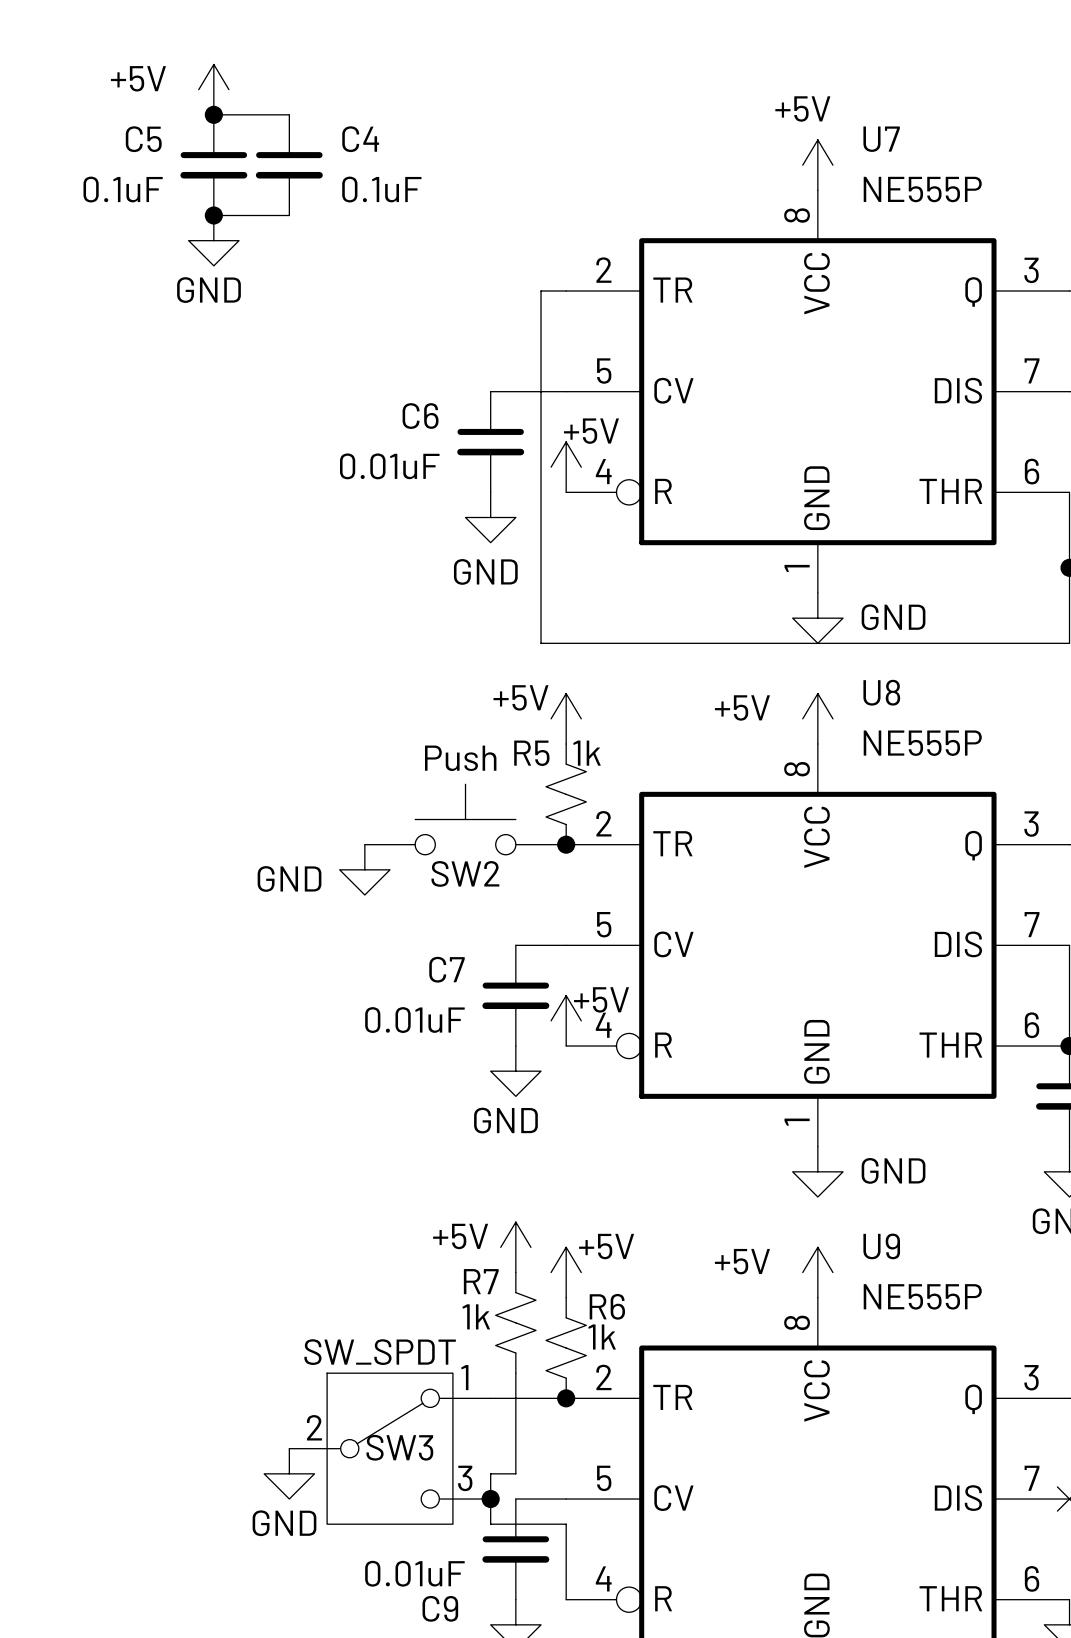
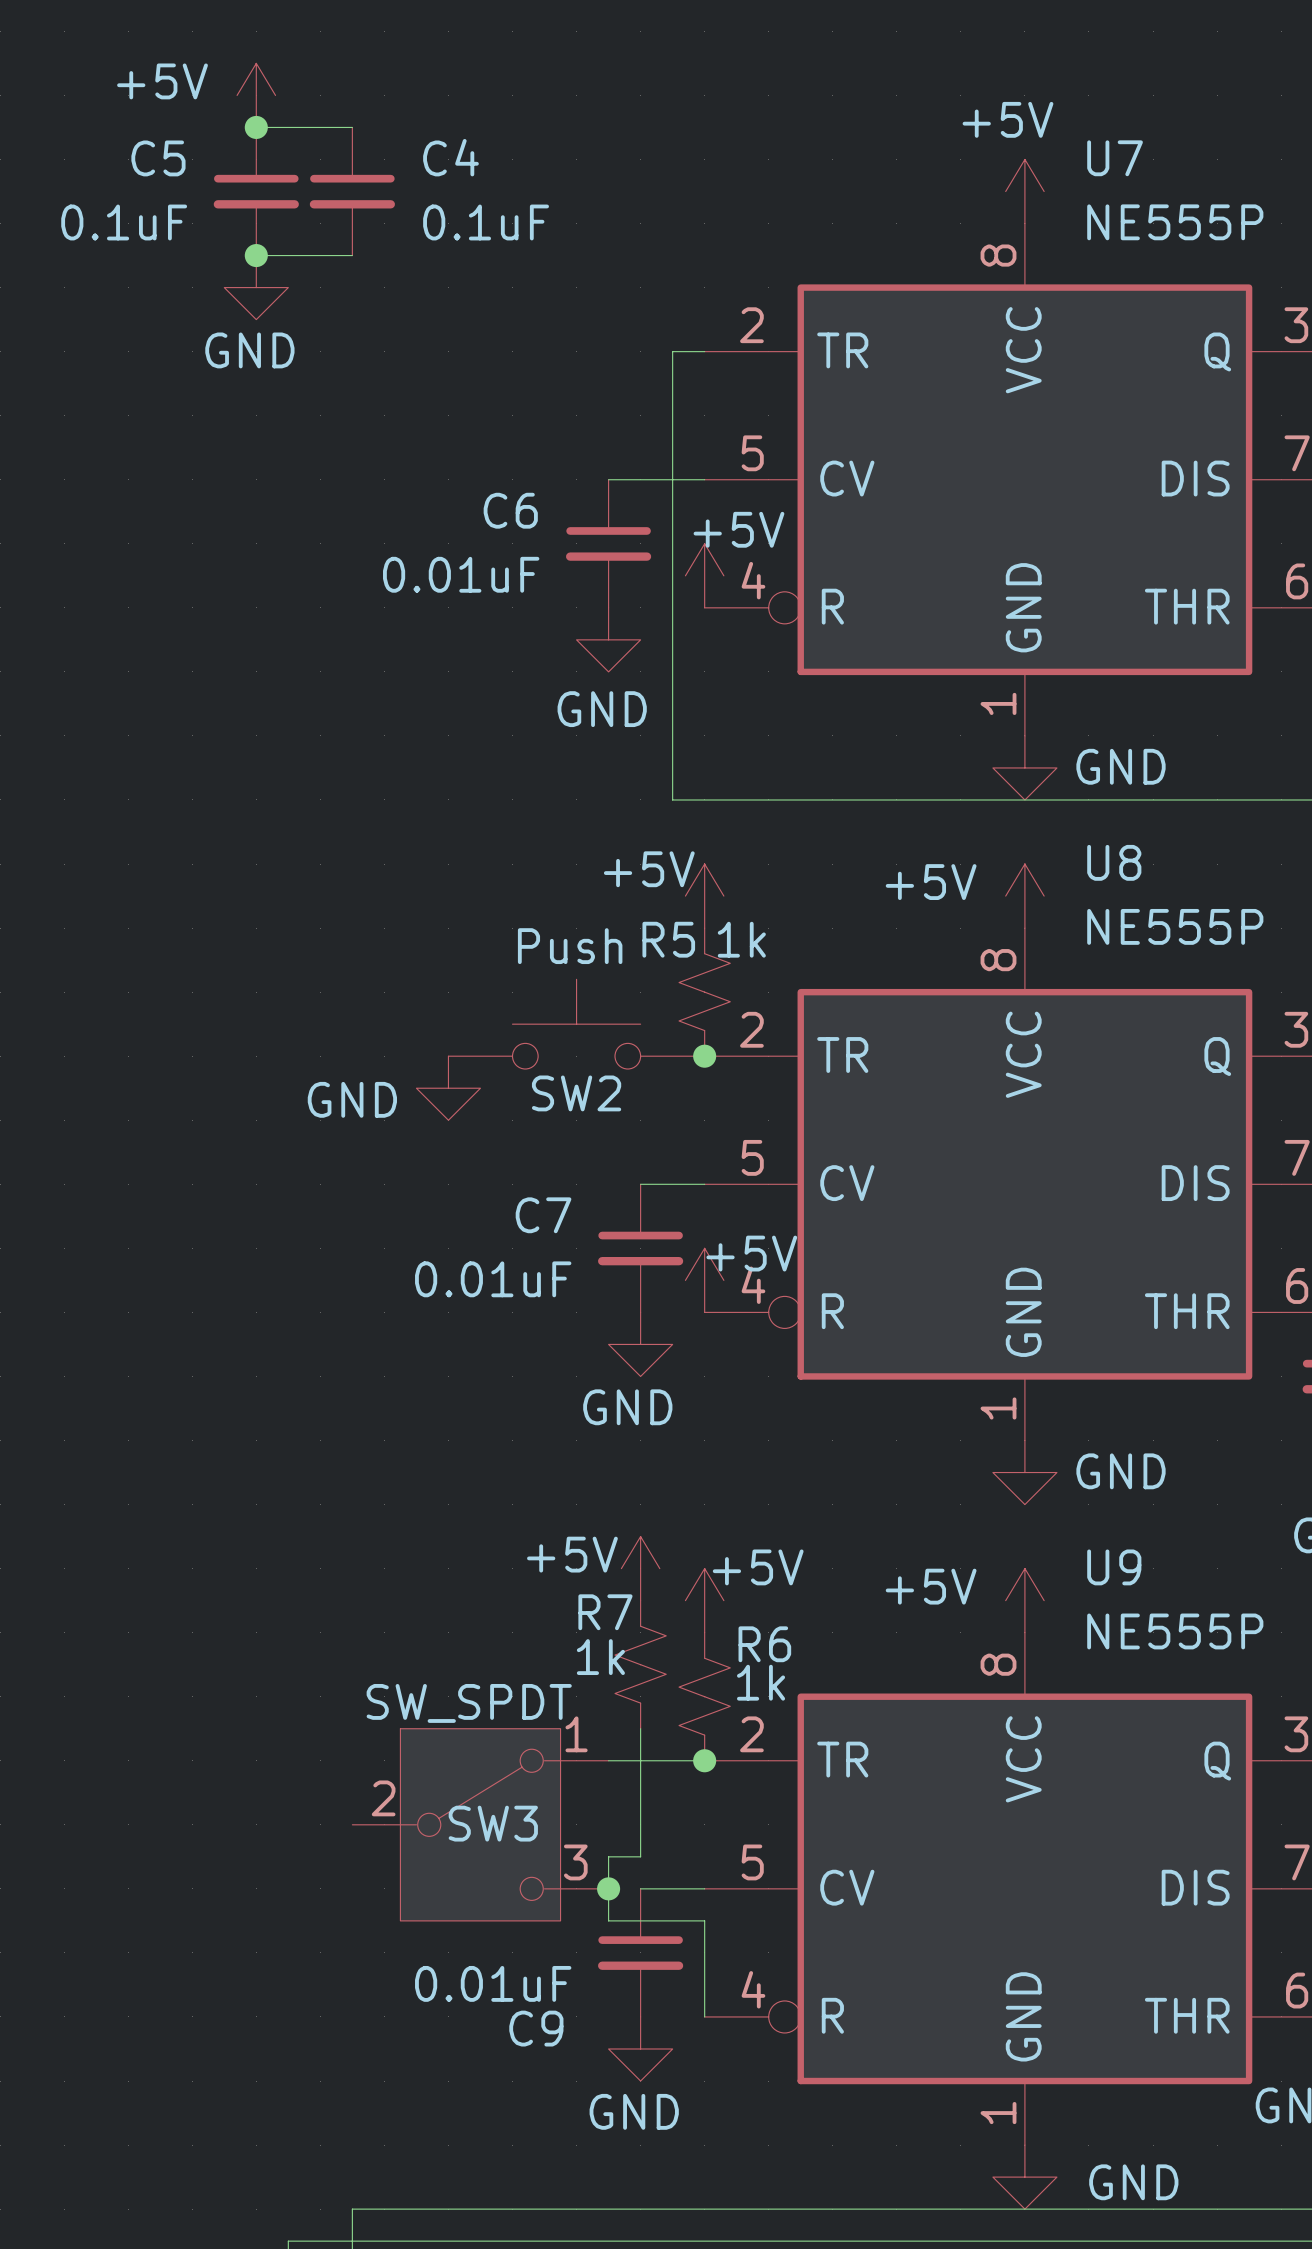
power symbol: GND (289, 1473) -> none

